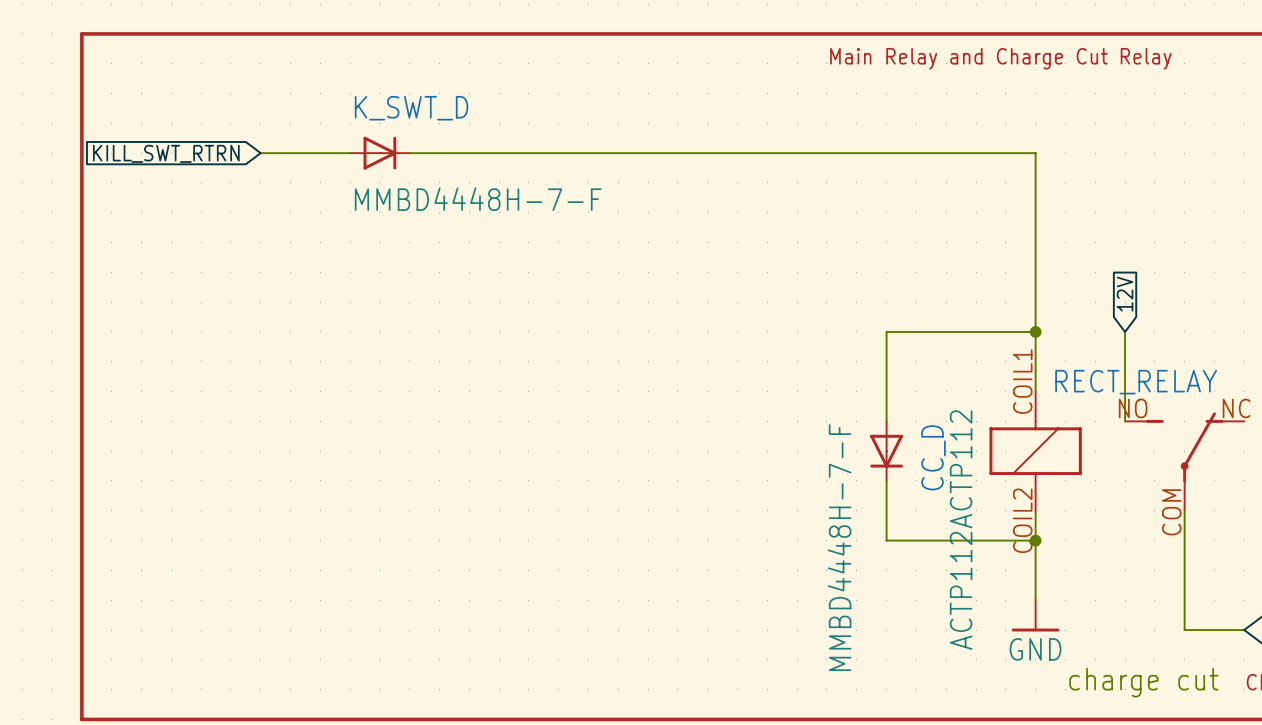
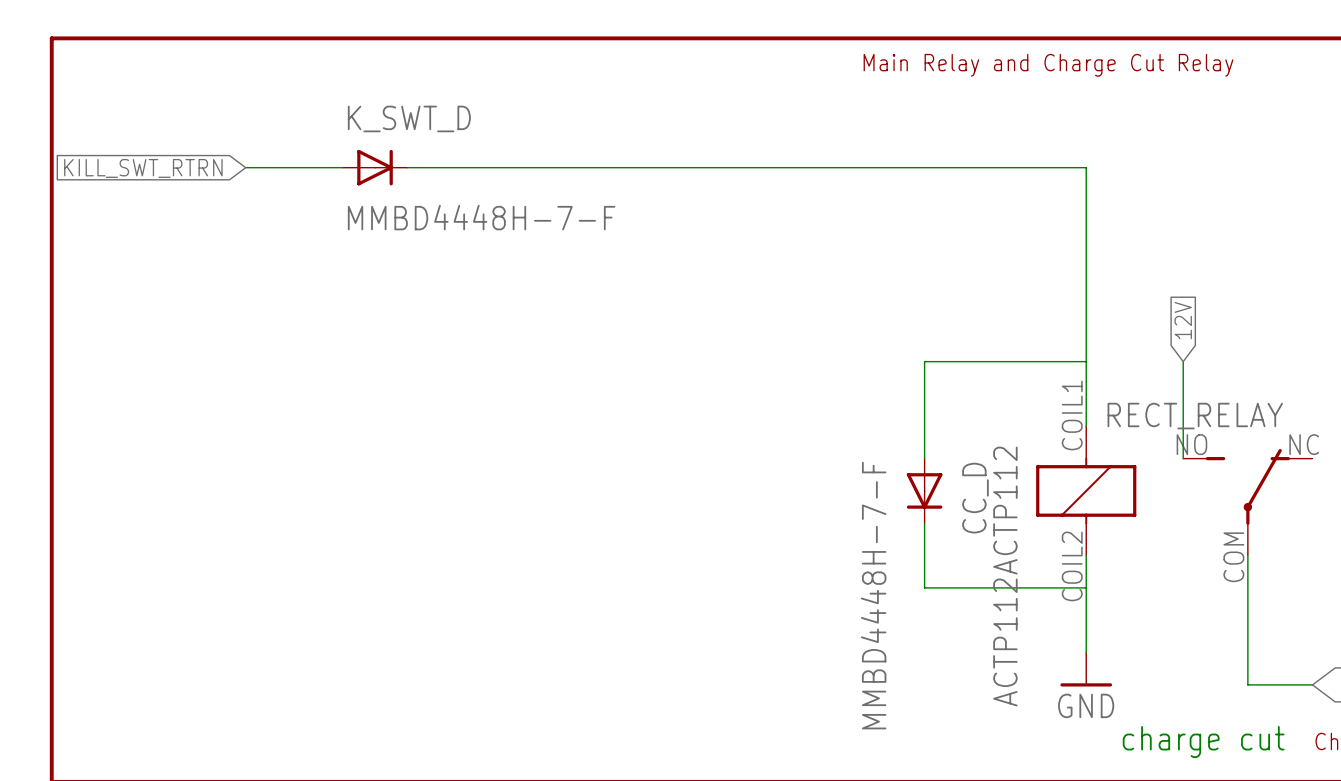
junction: (1035, 331) -> none
junction: (1035, 540) -> none

